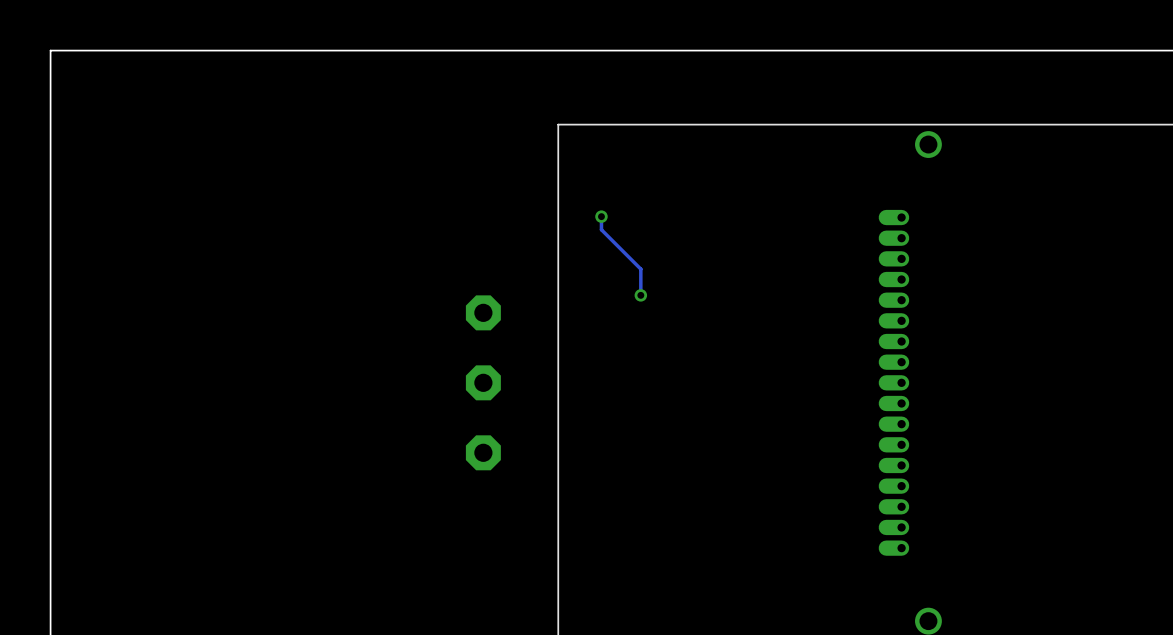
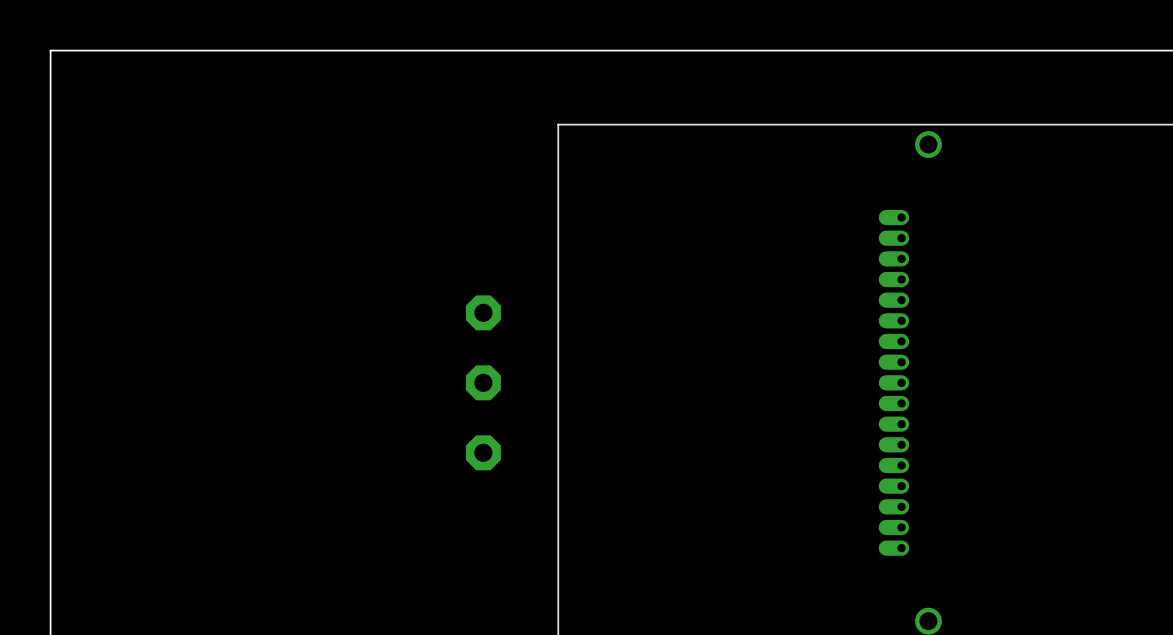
track: (601, 216) (601, 229) (640, 269) (640, 295) -> none
via: (601, 216) -> none
via: (640, 295) -> none

